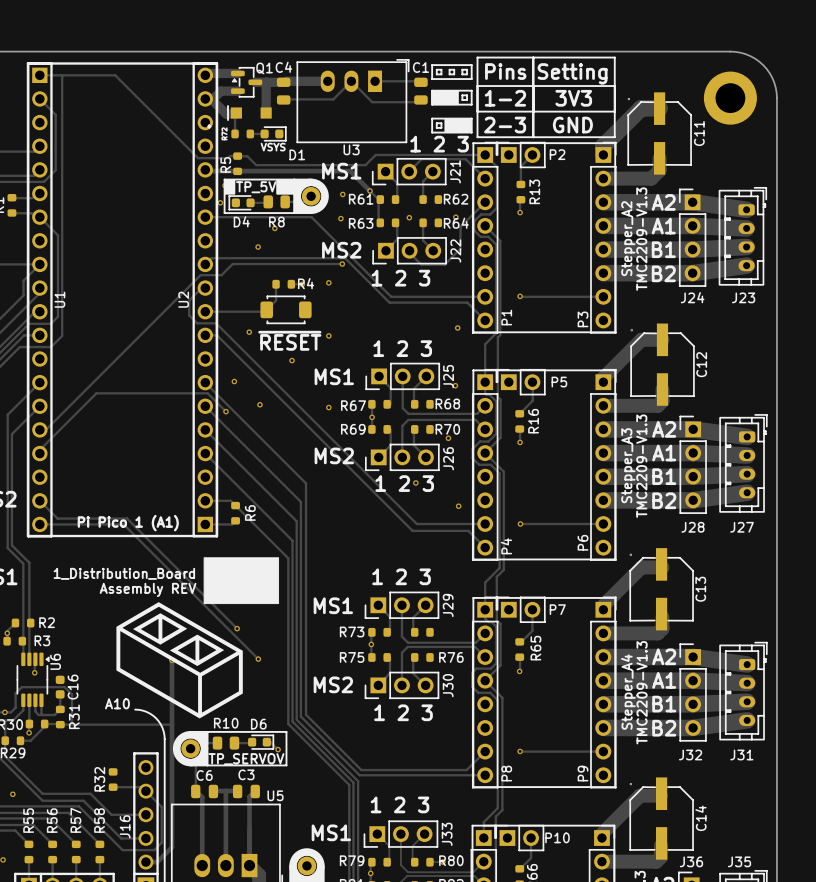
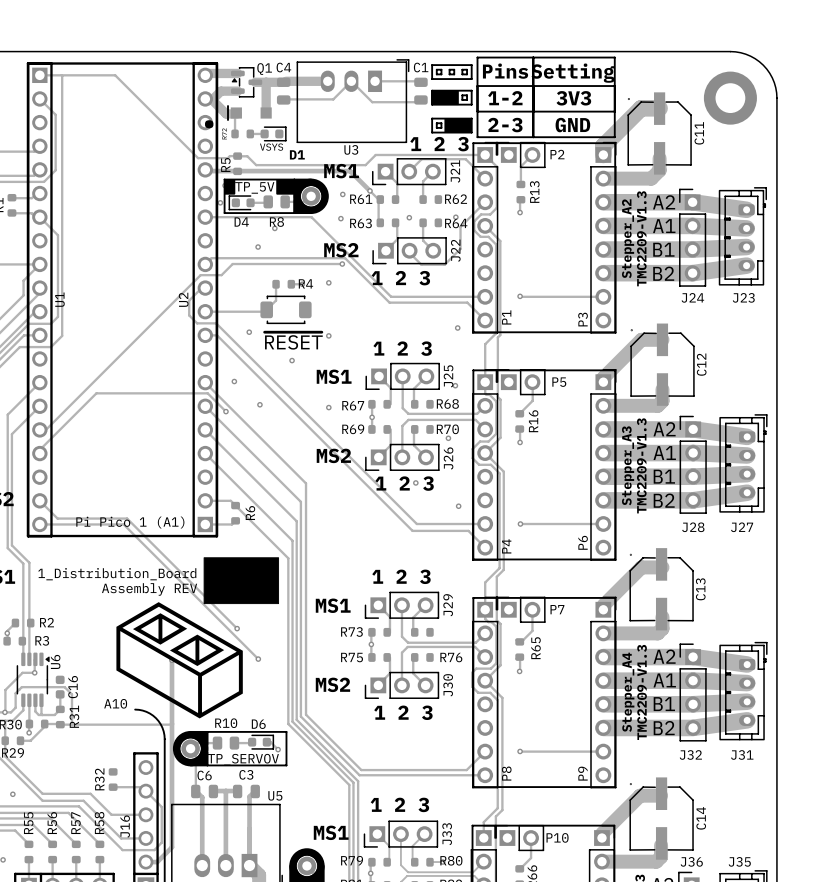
track: none -> (34, 672) (22, 672) (5, 690) (5, 711)

